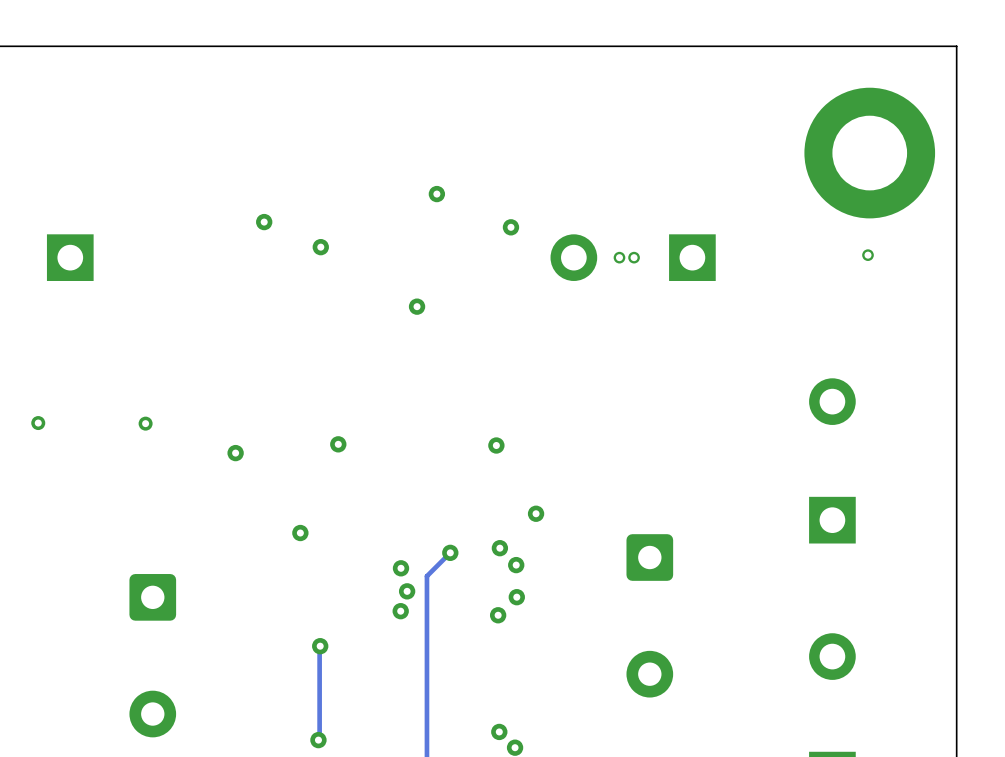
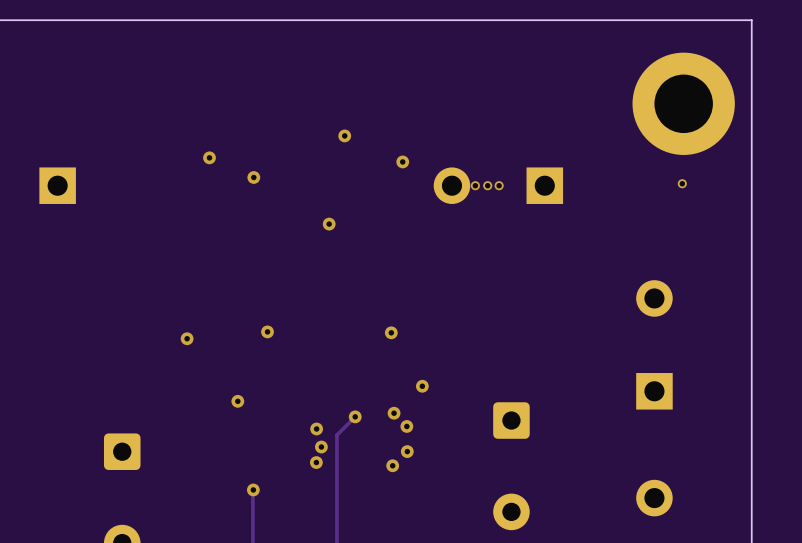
via: none -> (475, 185)
via: (38, 423) -> none
via: (145, 423) -> none

